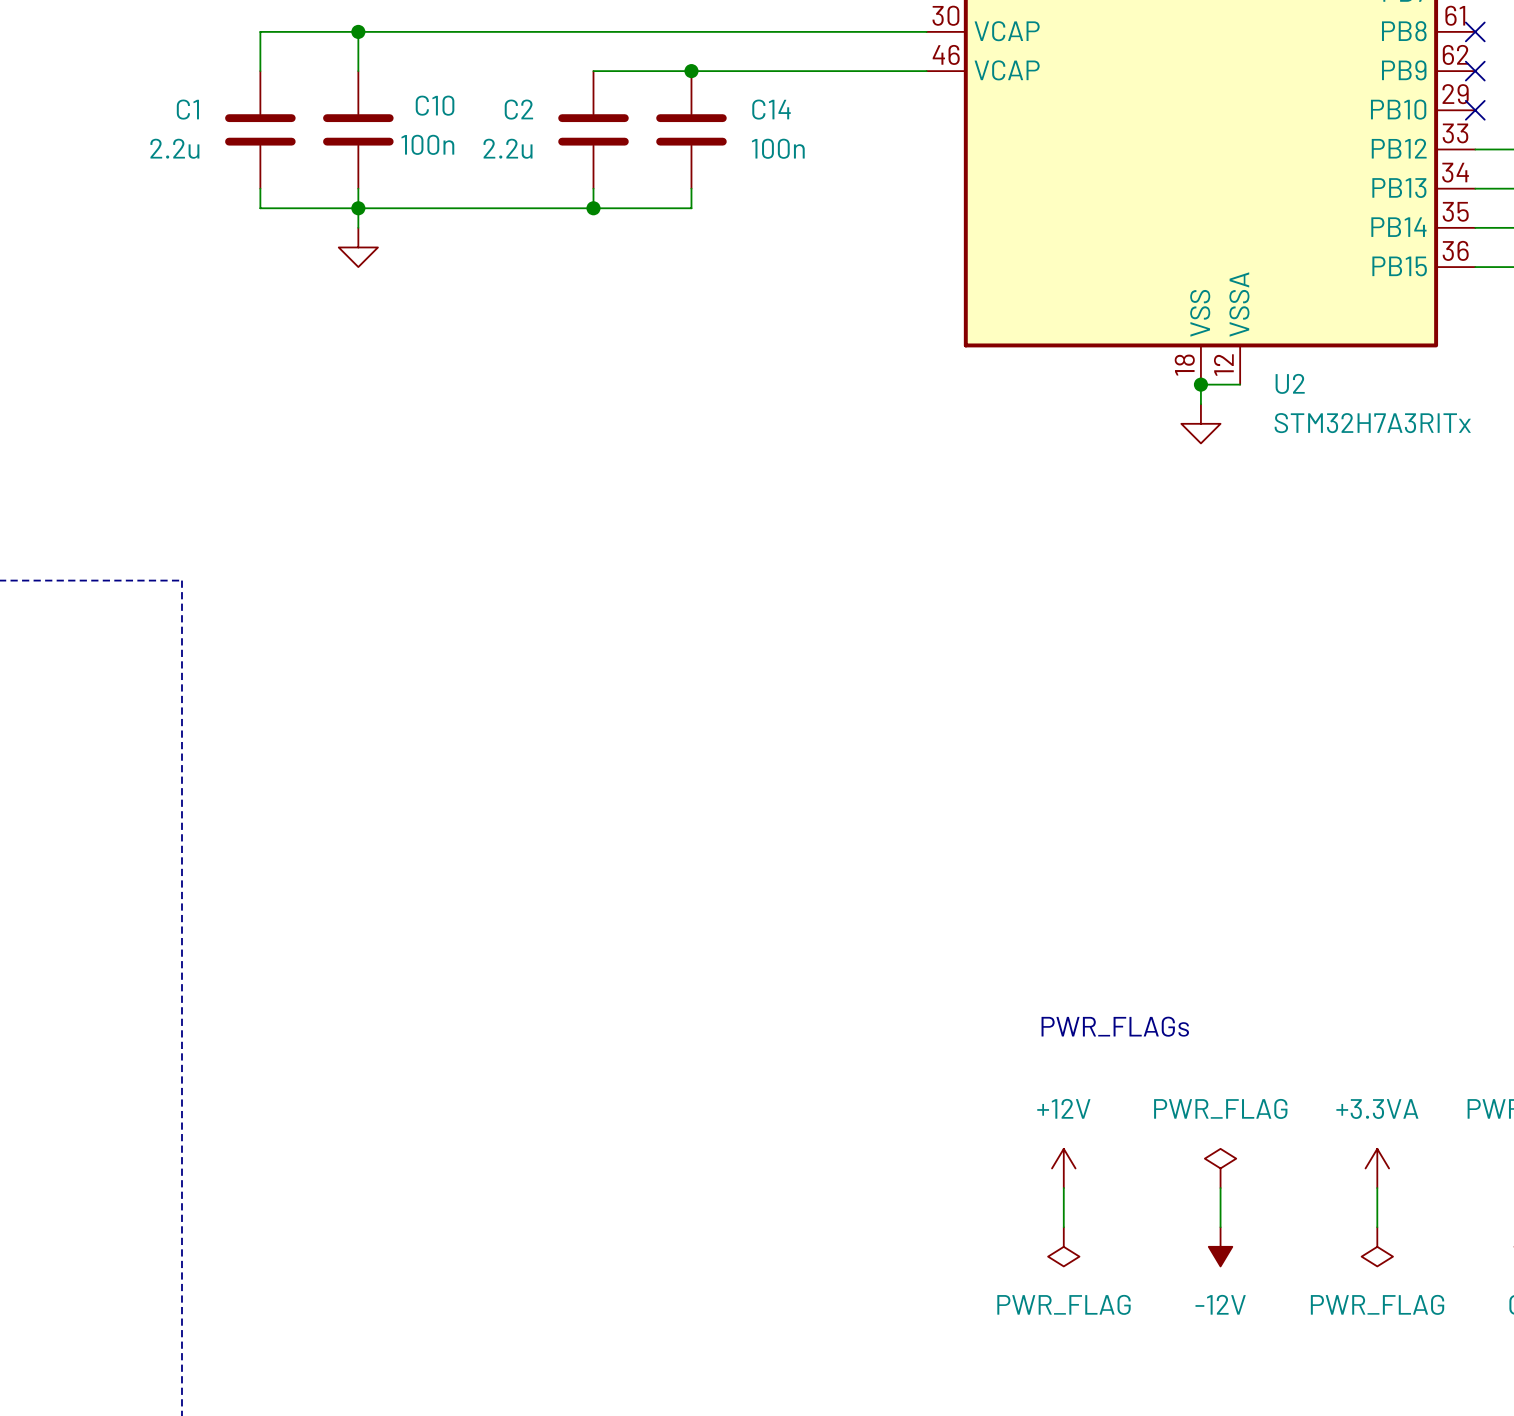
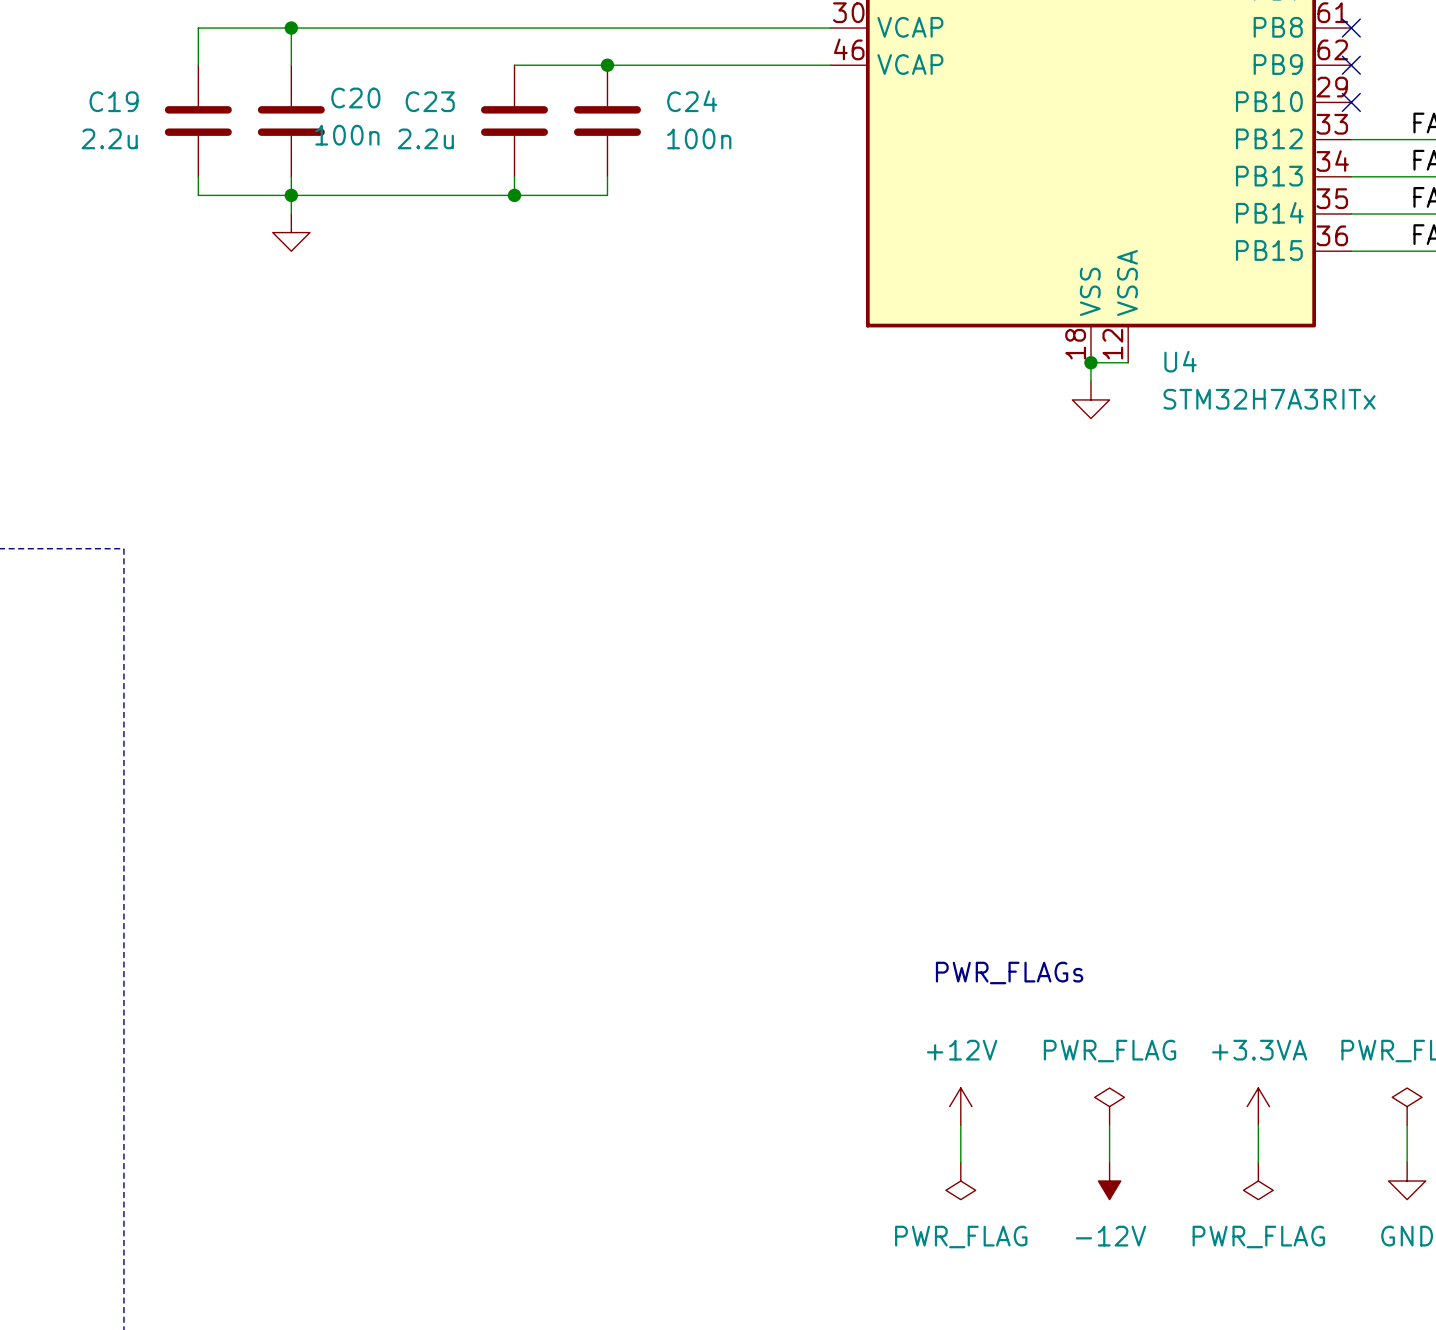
C10 name: C10 (435, 105) -> C20 (355, 98)
C1 name: C1 (187, 109) -> C19 (114, 101)
C2 name: C2 (518, 109) -> C23 (430, 101)
C14 name: C14 (771, 109) -> C24 (692, 101)
U2 name: U2 (1290, 383) -> U4 (1180, 361)

